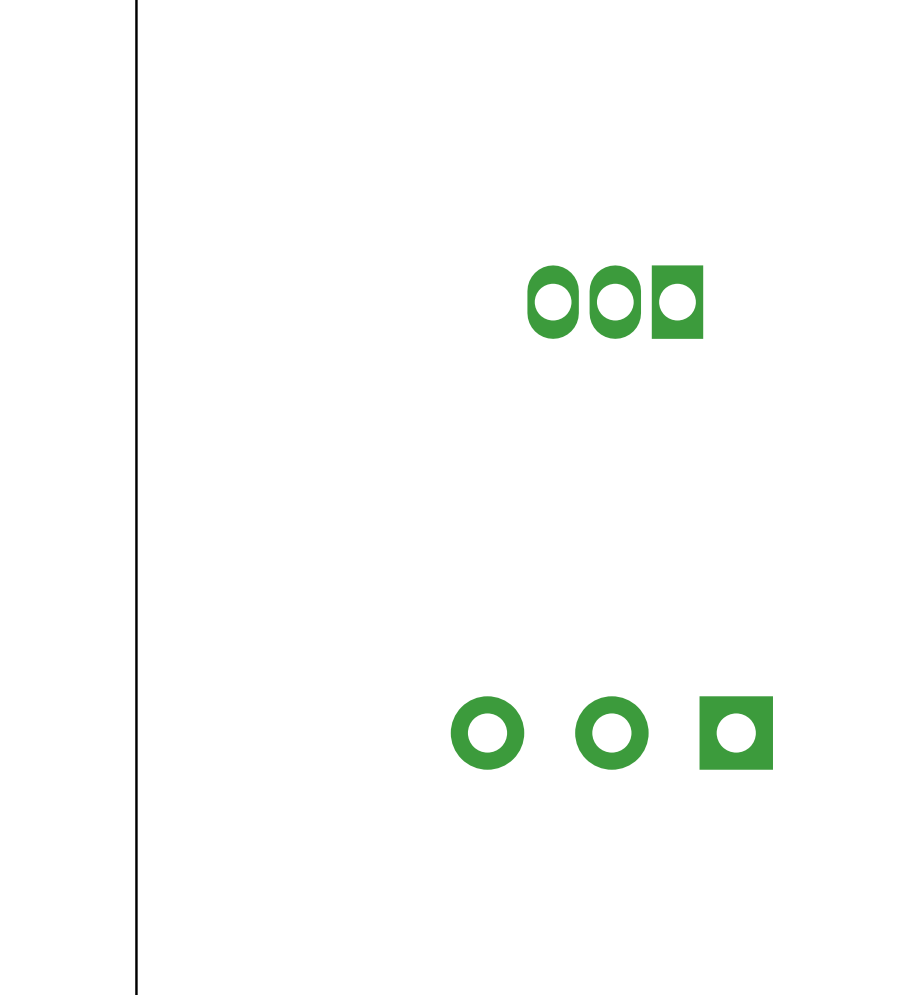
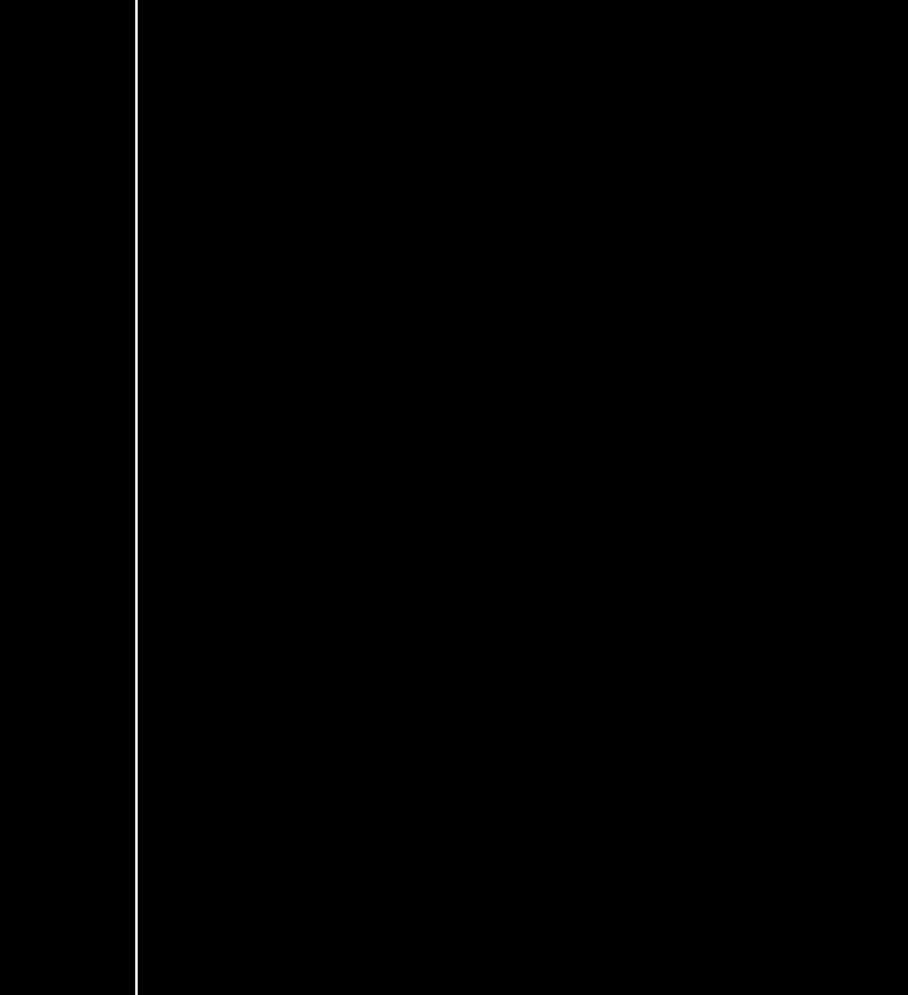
part: (615, 302) -> none
part: (611, 733) -> none

